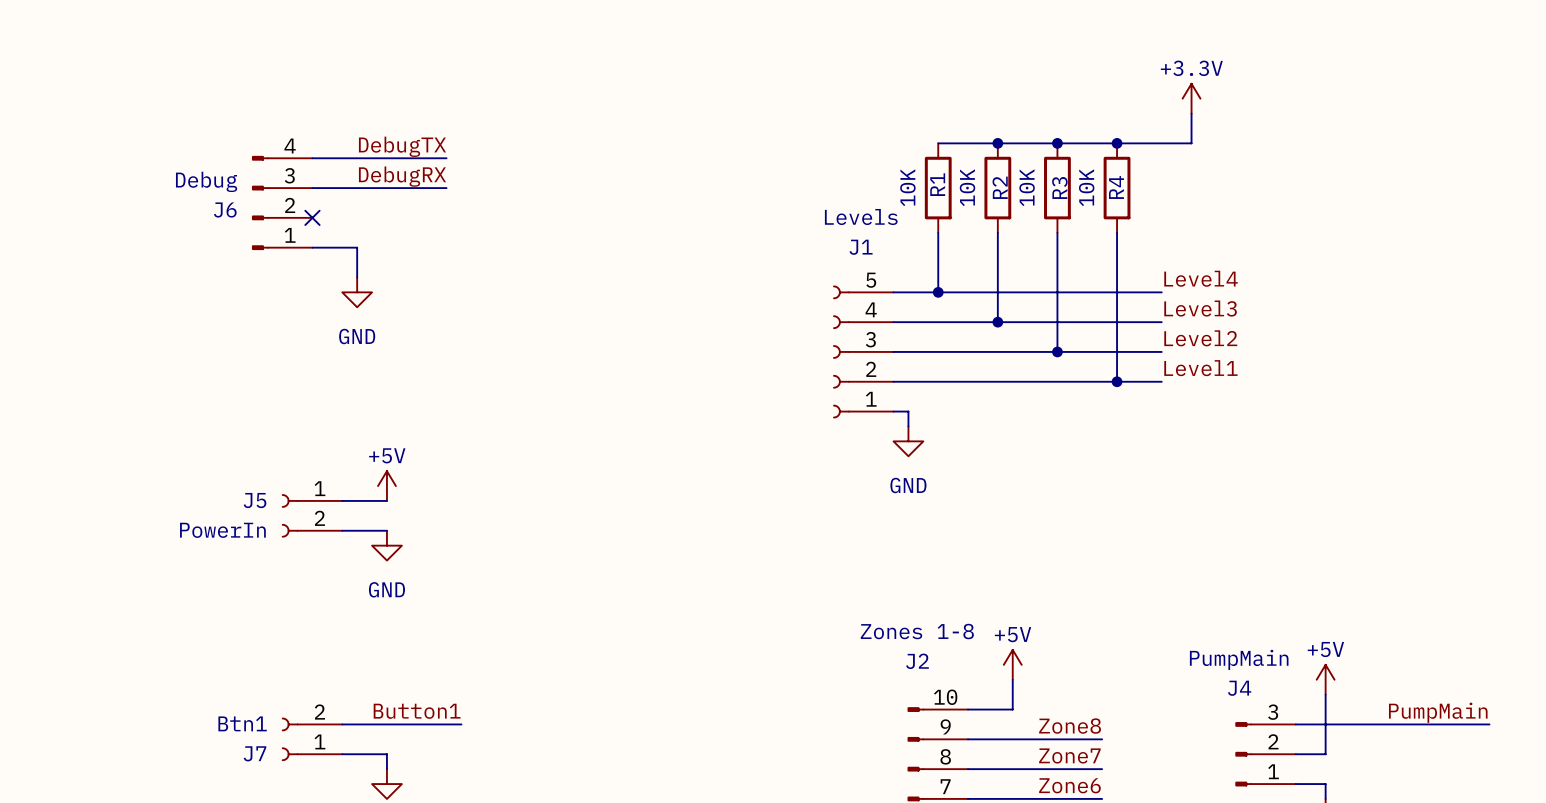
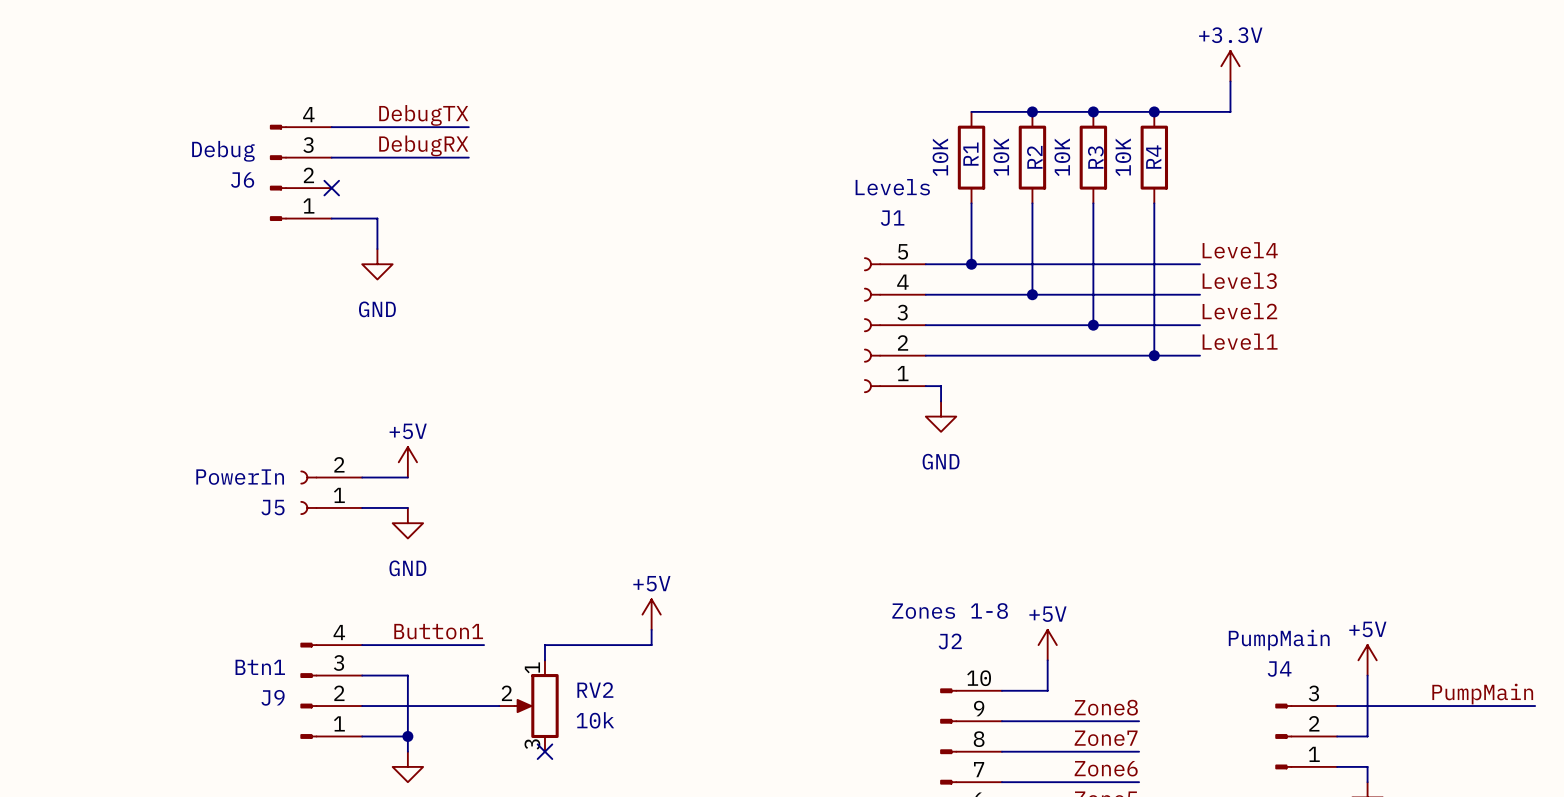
J5 flip: as is (290, 515) -> up-down (308, 492)
power symbol: none -> +5V (651, 614)
wire: none -> (651, 629) (651, 645) (544, 645) (544, 660)
wire: none -> (362, 645) (484, 645)
wire: none -> (362, 675) (407, 675) (407, 736)
J9: none -> Btn1 (331, 690)
label position: Button1 (417, 711) -> Button1 (438, 631)
wire: none -> (484, 706) (499, 706)
RV2: none -> 10k (528, 706)
J7: Btn1 (312, 739) -> none
junction: none -> (407, 736)
no-connect mark: none -> (544, 751)

